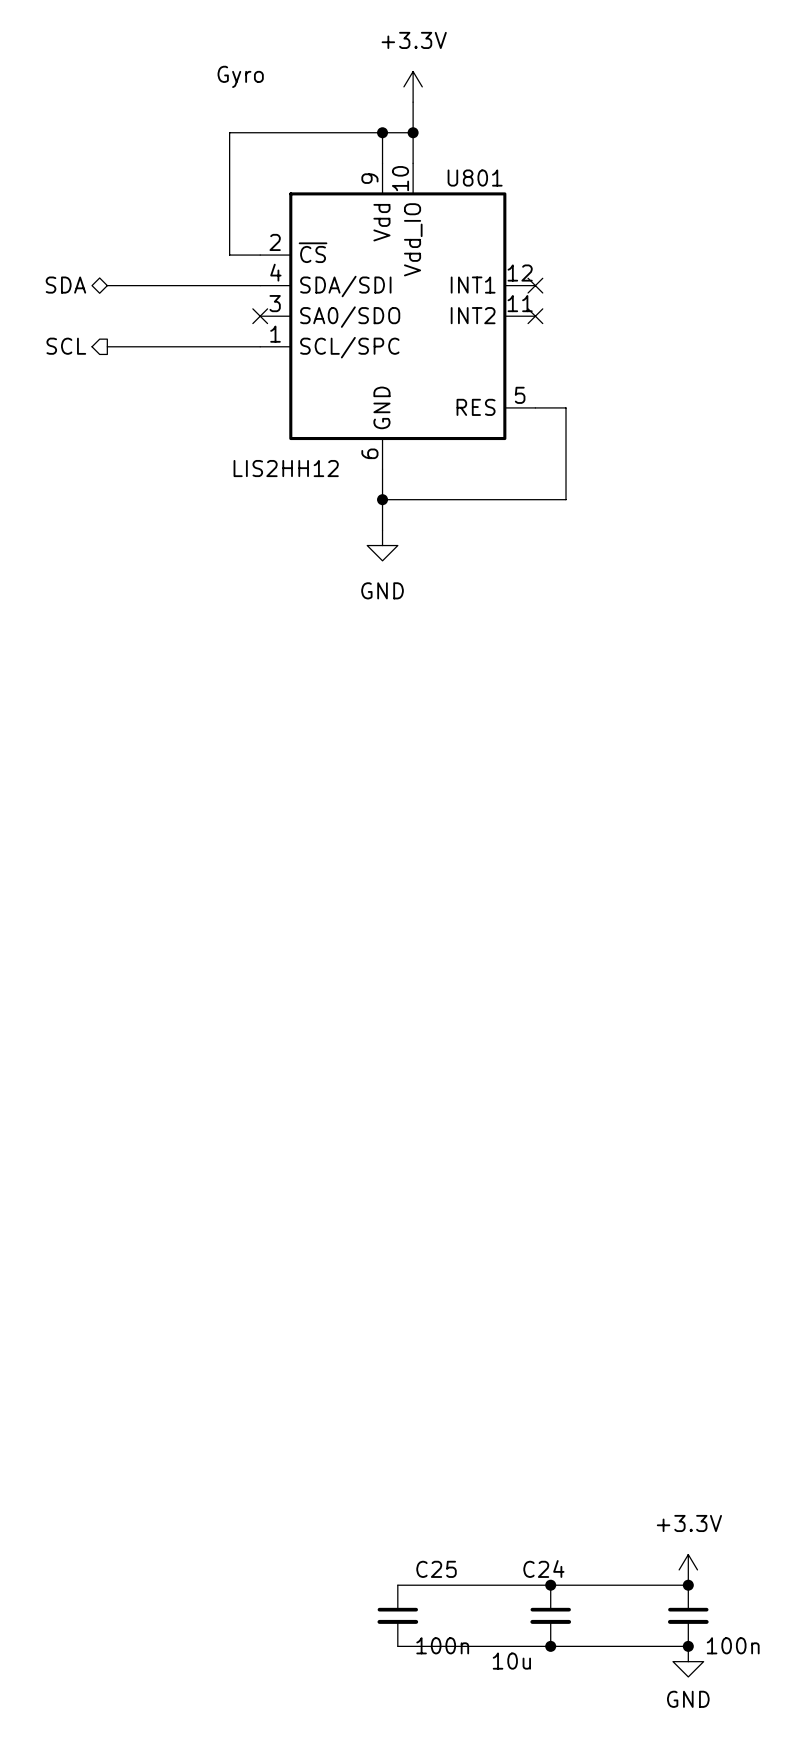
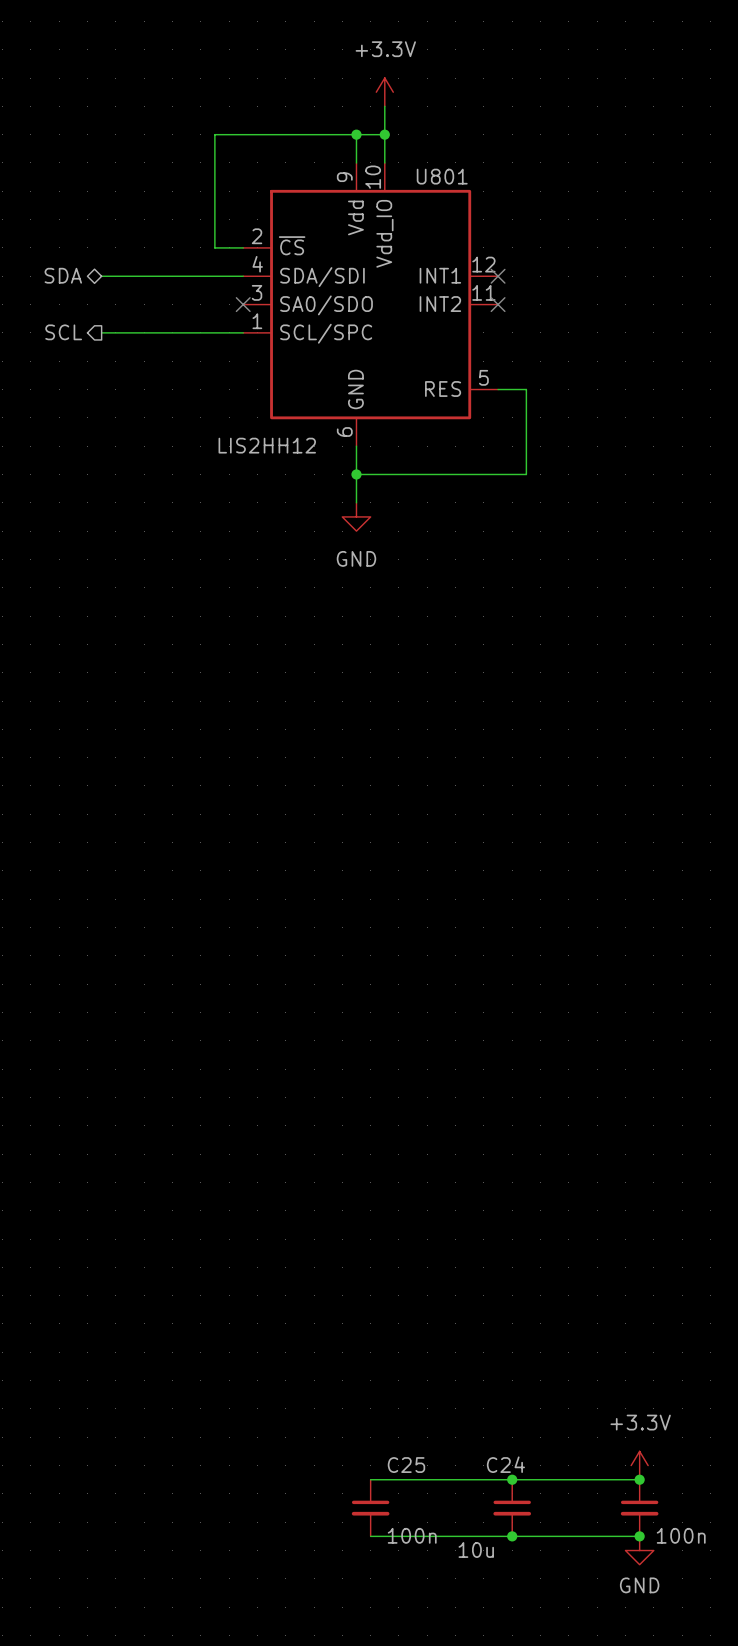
text: Gyro (240, 76) -> none

